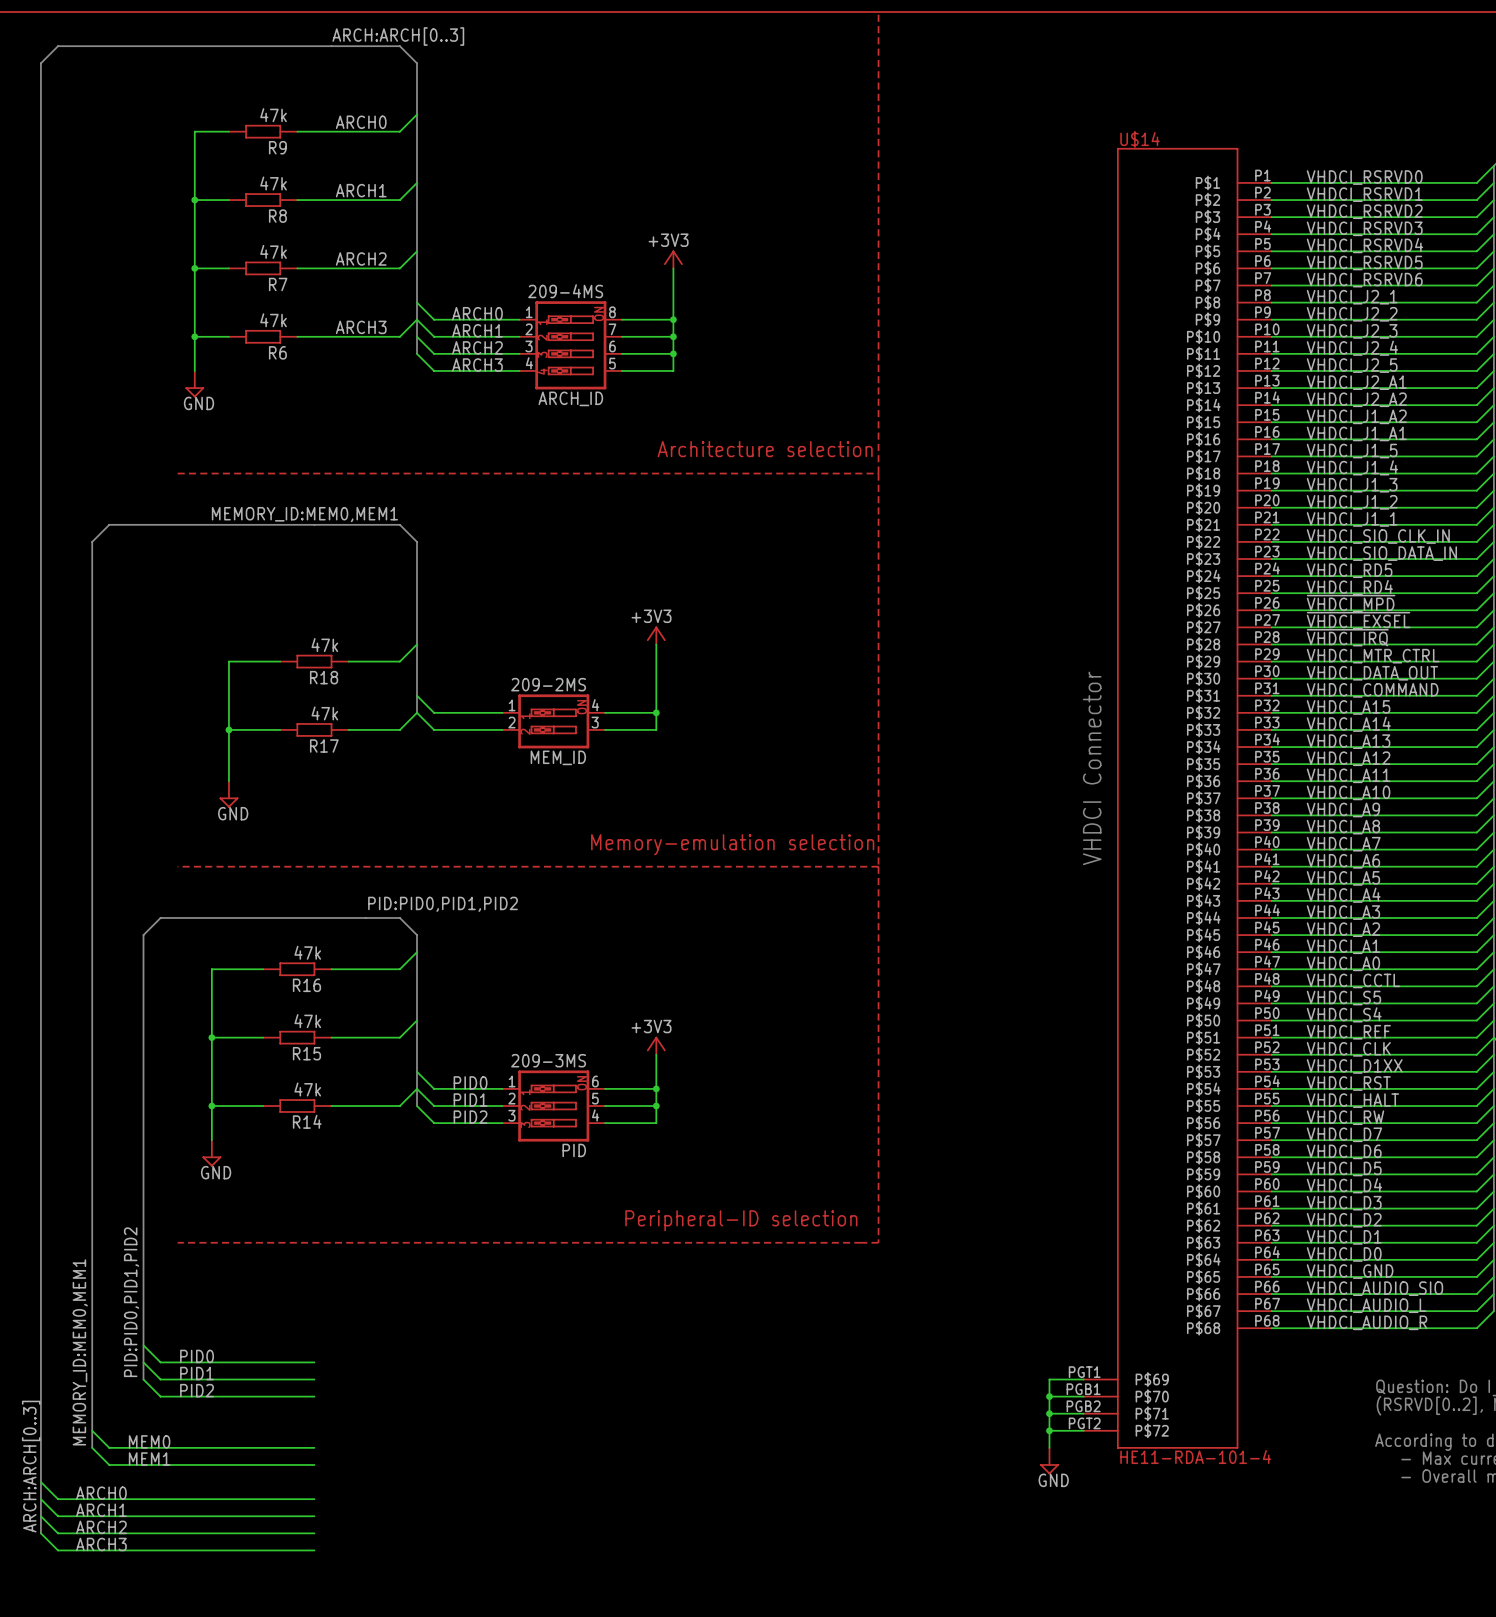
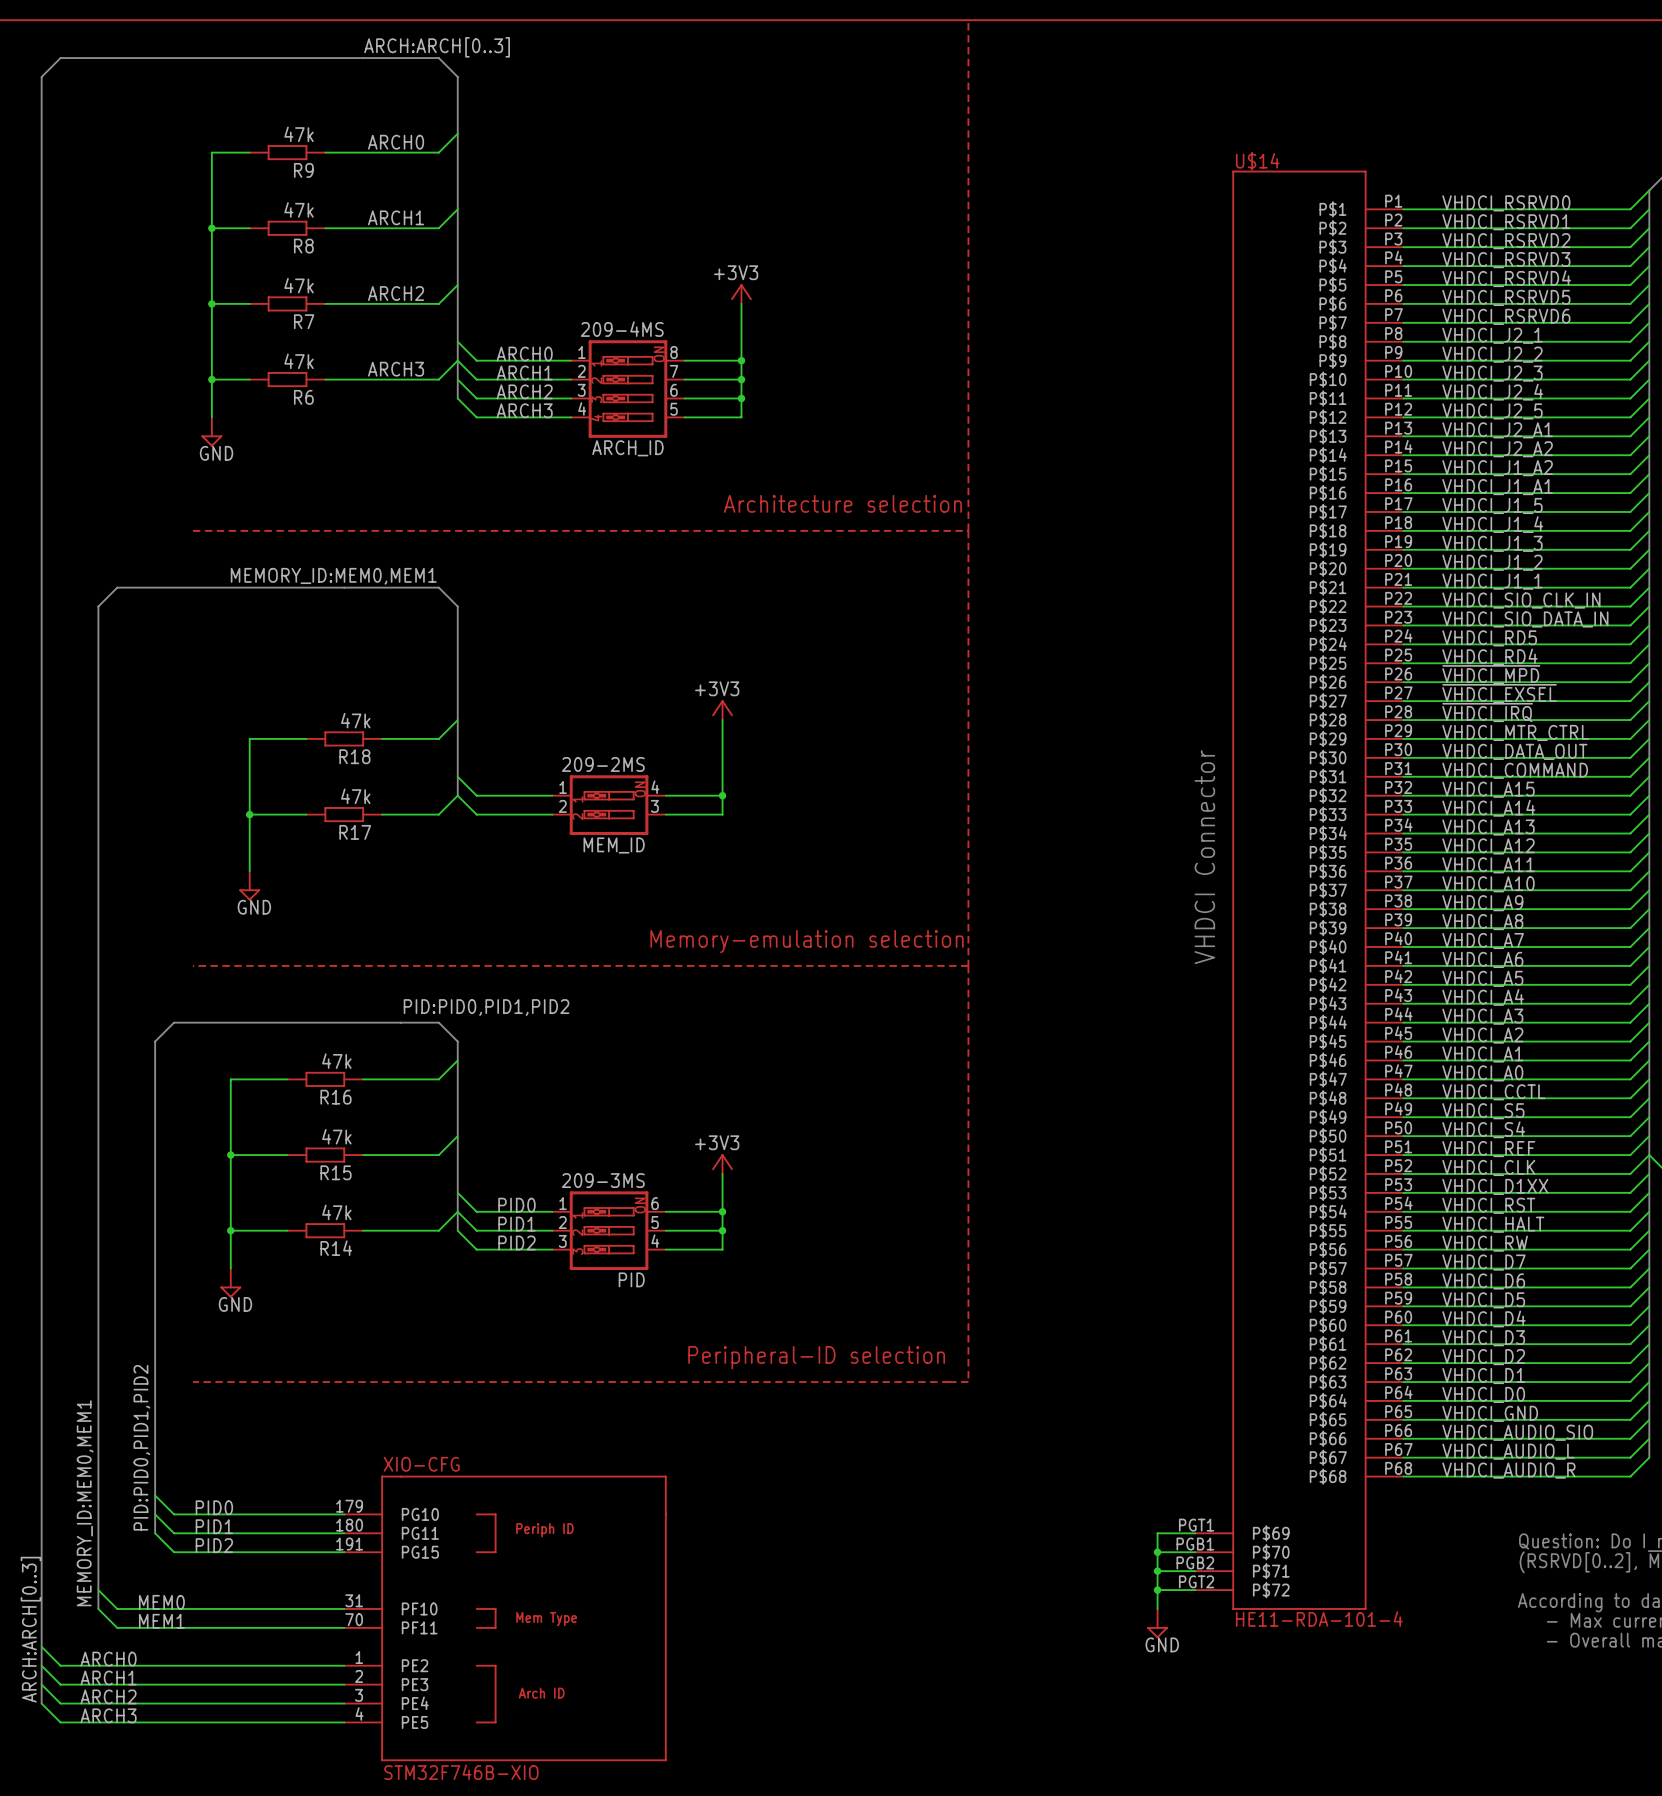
XIO-CFG: none -> STM32F746B-XIO (505, 1618)

